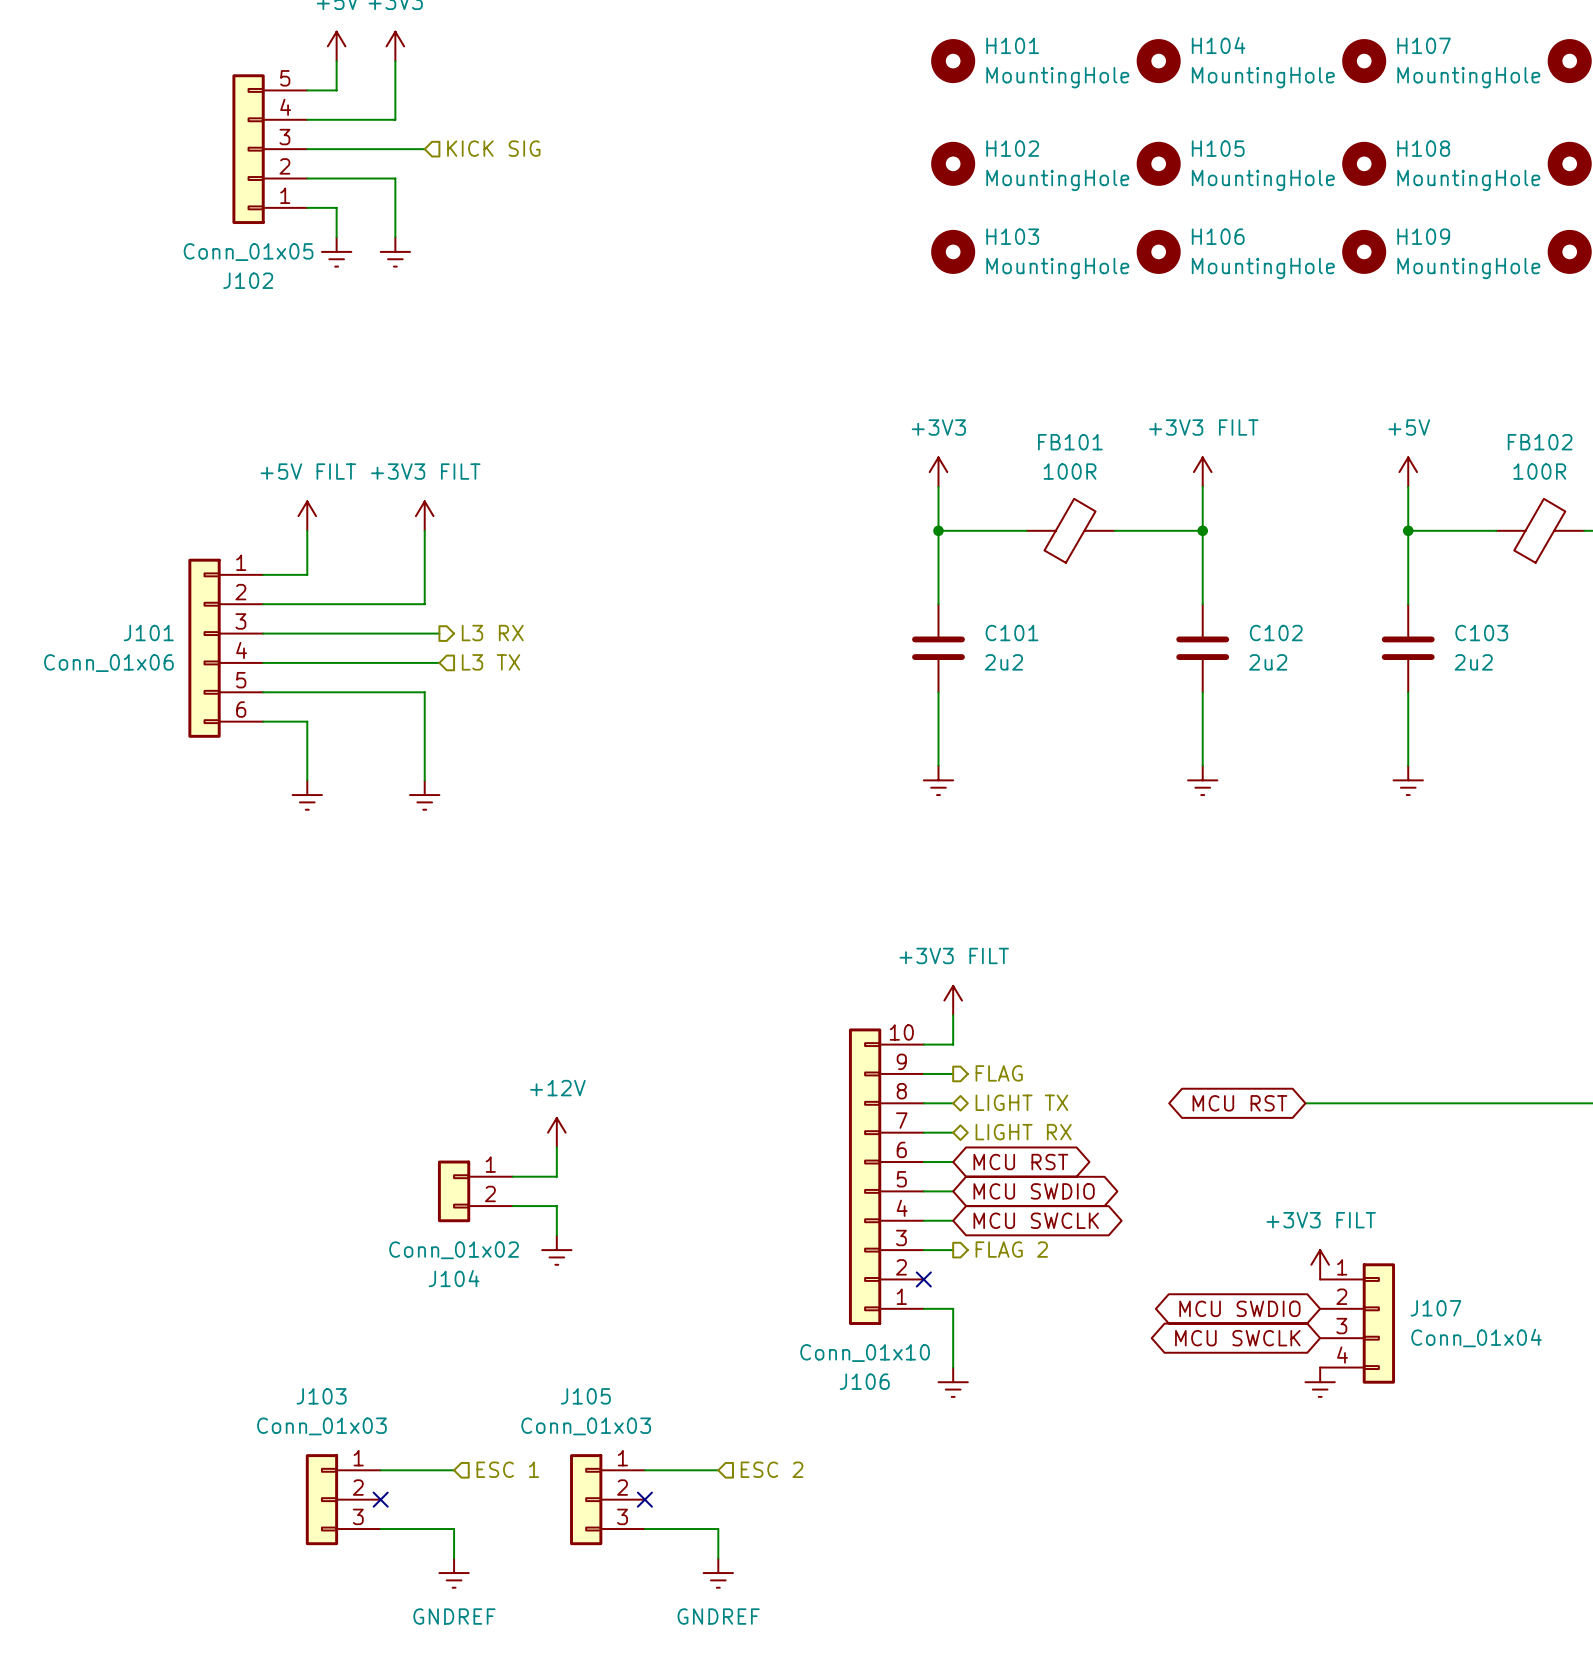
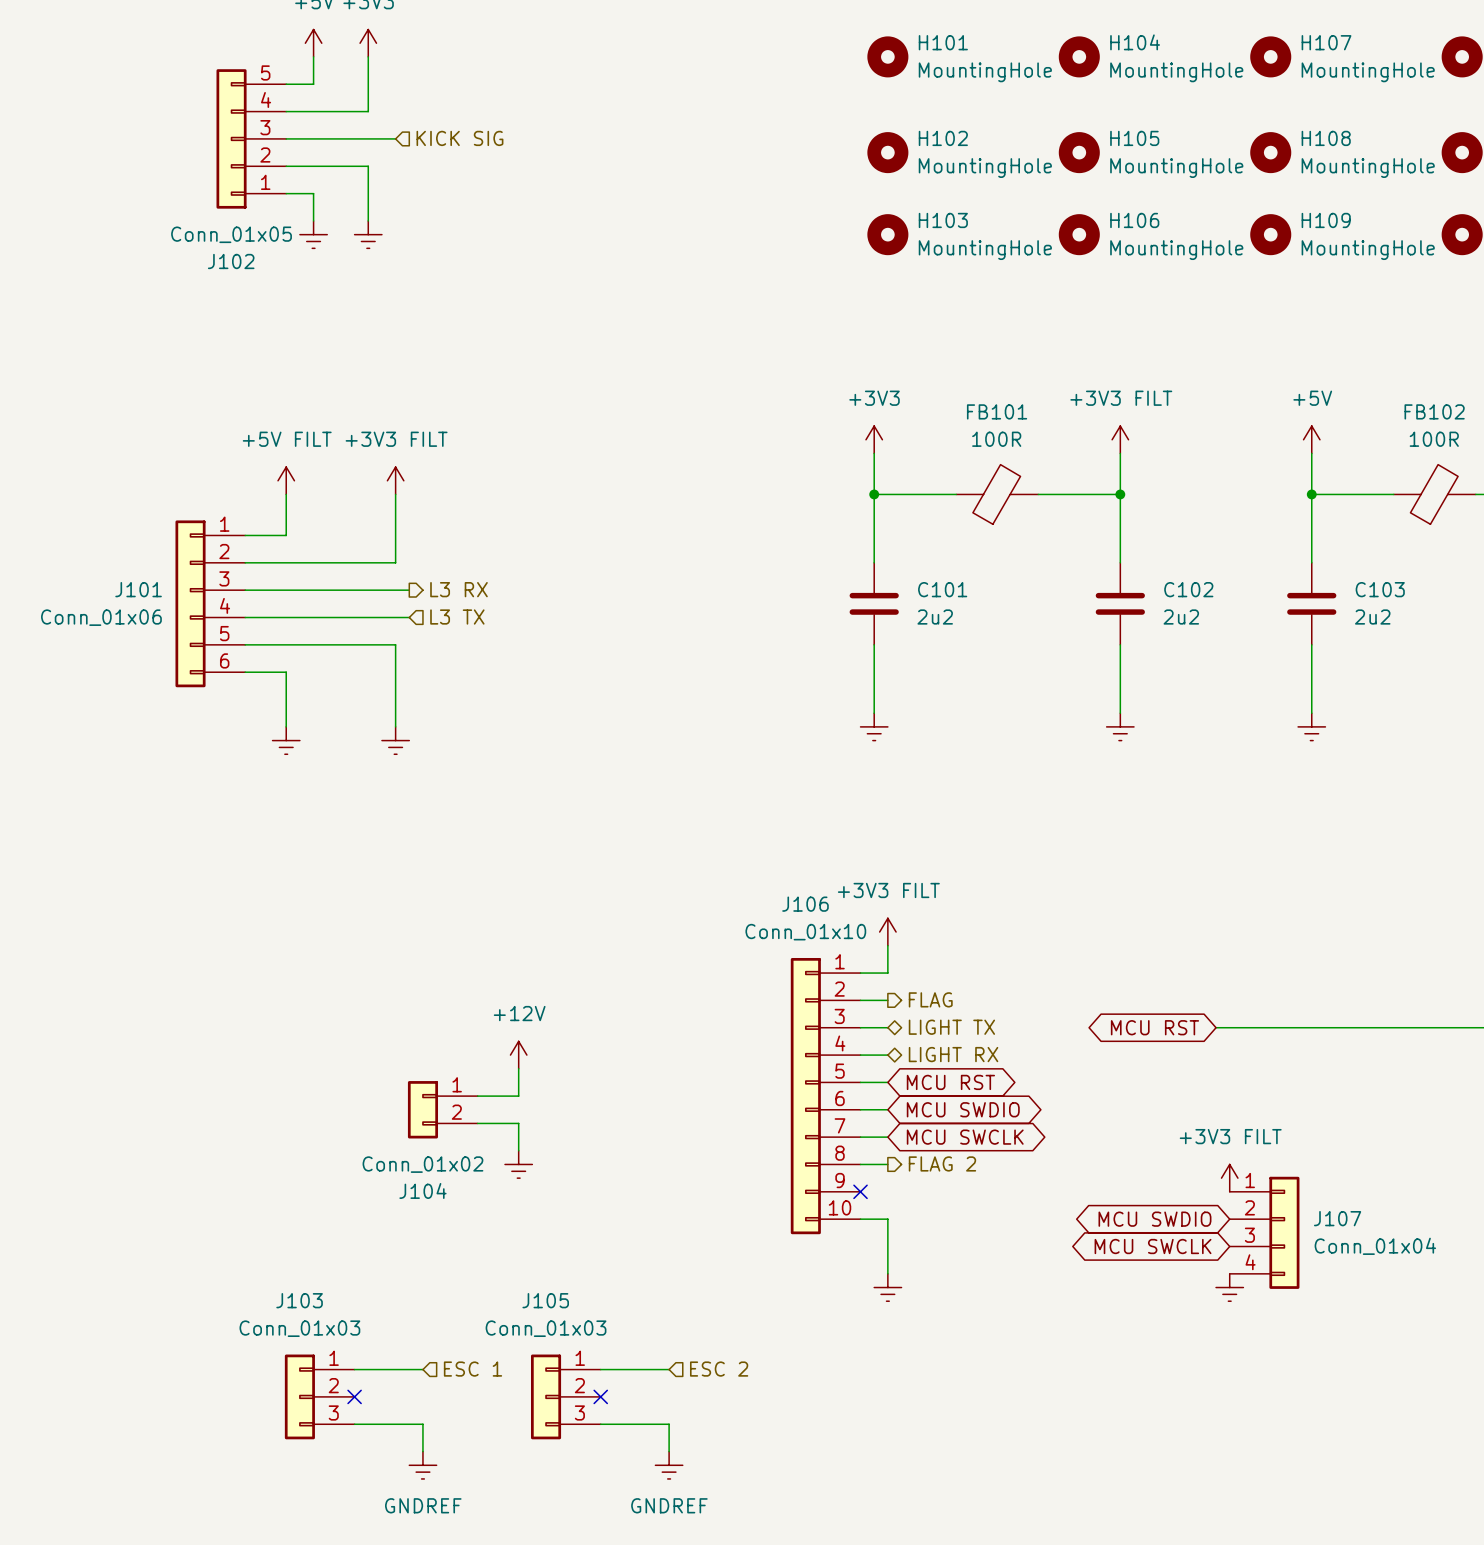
J106 flip: as is (865, 1176) -> up-down (805, 1096)

